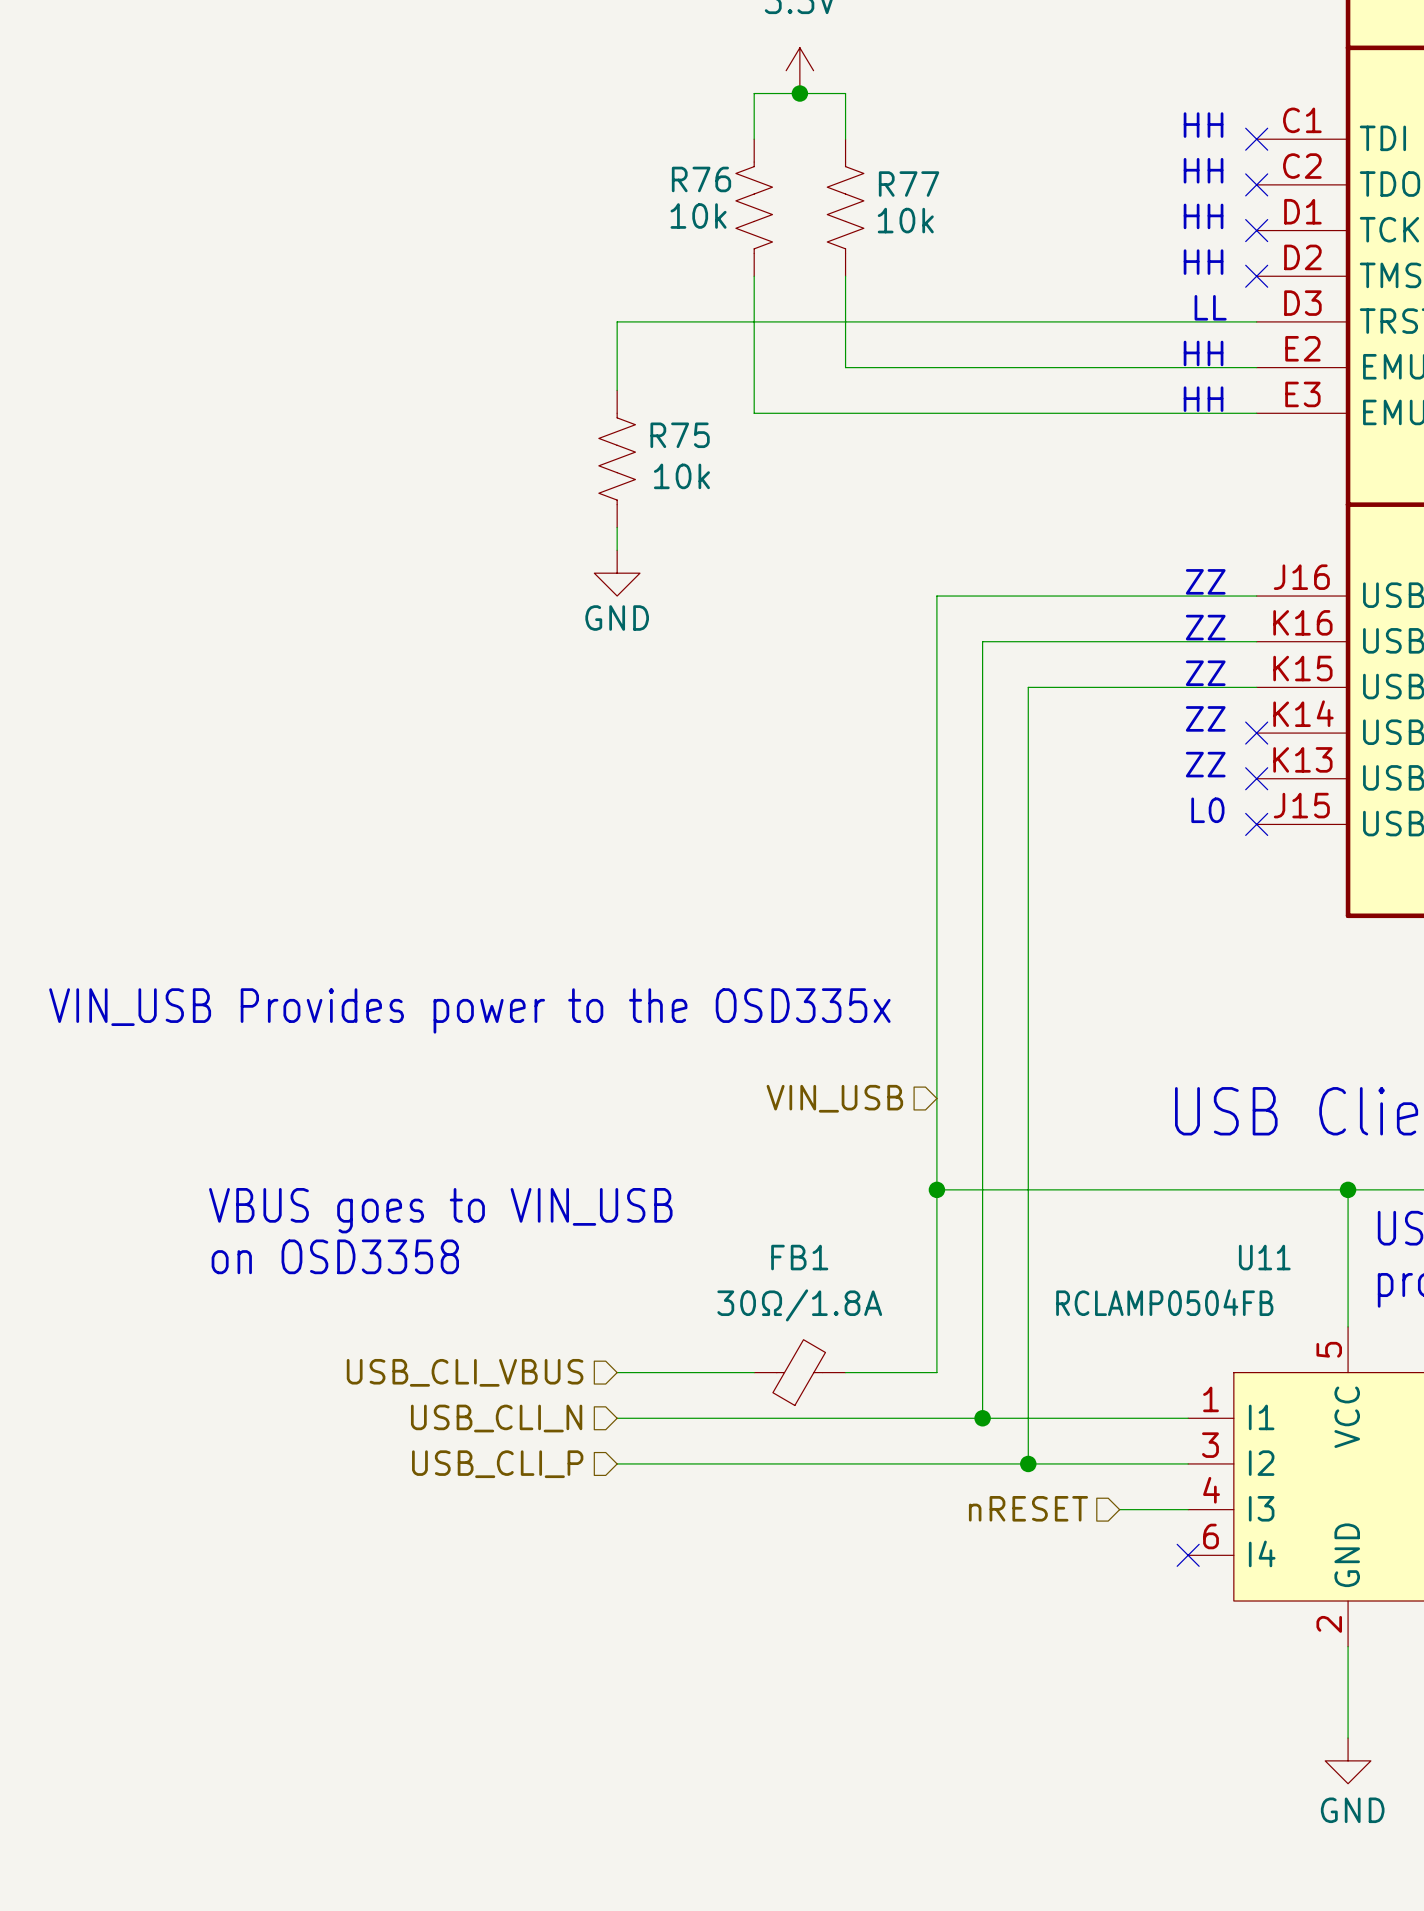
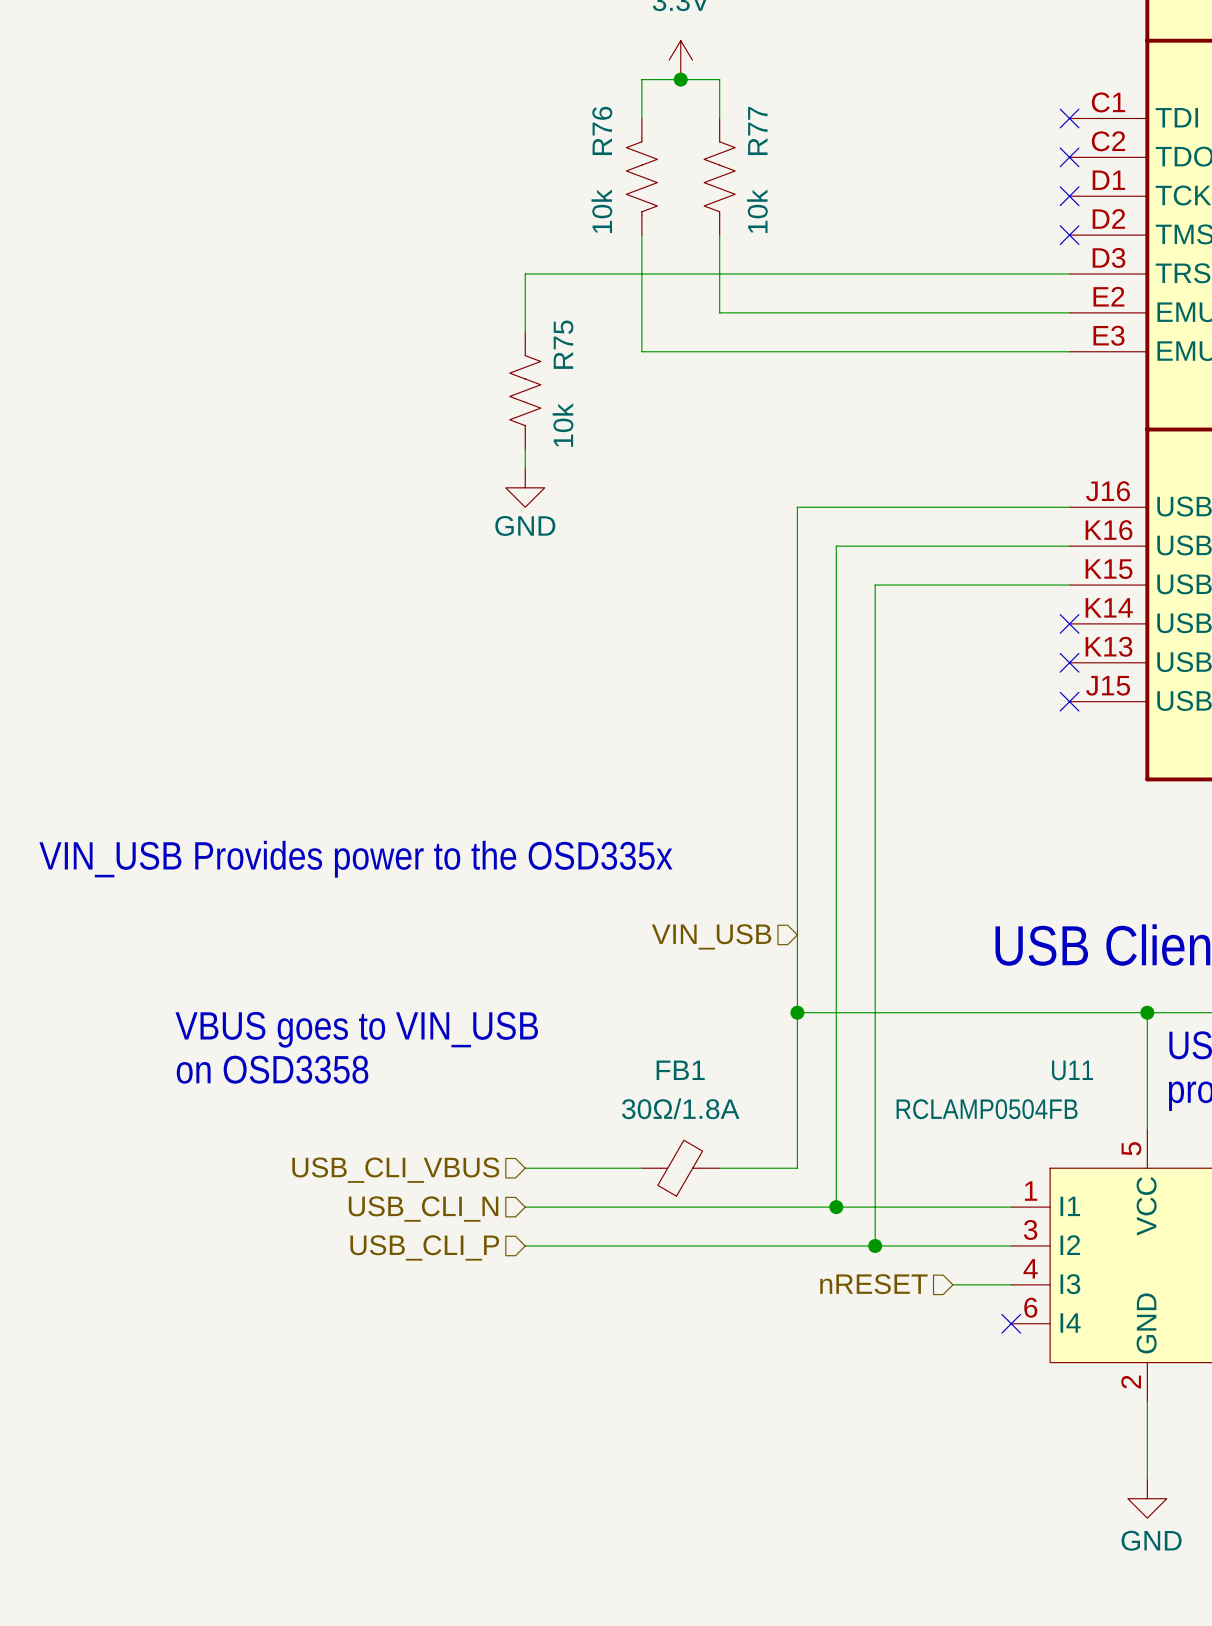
text: HH (1203, 125) -> none
text: HH (1203, 170) -> none
R76 name rotation: 0° (701, 179) -> 90° counterclockwise (602, 130)
R77 name rotation: 0° (909, 184) -> 90° counterclockwise (757, 130)
R76 value rotation: 0° (698, 216) -> 90° counterclockwise (601, 211)
text: HH (1203, 216) -> none
R77 value rotation: 0° (905, 220) -> 90° counterclockwise (757, 211)
text: HH (1203, 262) -> none
text: LL (1210, 307) -> none
text: HH (1203, 353) -> none
text: HH (1203, 399) -> none
R75 name rotation: 0° (680, 435) -> 90° counterclockwise (563, 344)
R75 value rotation: 0° (681, 476) -> 90° counterclockwise (563, 425)
text: ZZ (1205, 581) -> none
text: ZZ (1205, 627) -> none
text: ZZ (1205, 673) -> none
text: ZZ (1205, 718) -> none
text: ZZ (1205, 764) -> none
text: L0 (1207, 810) -> none

